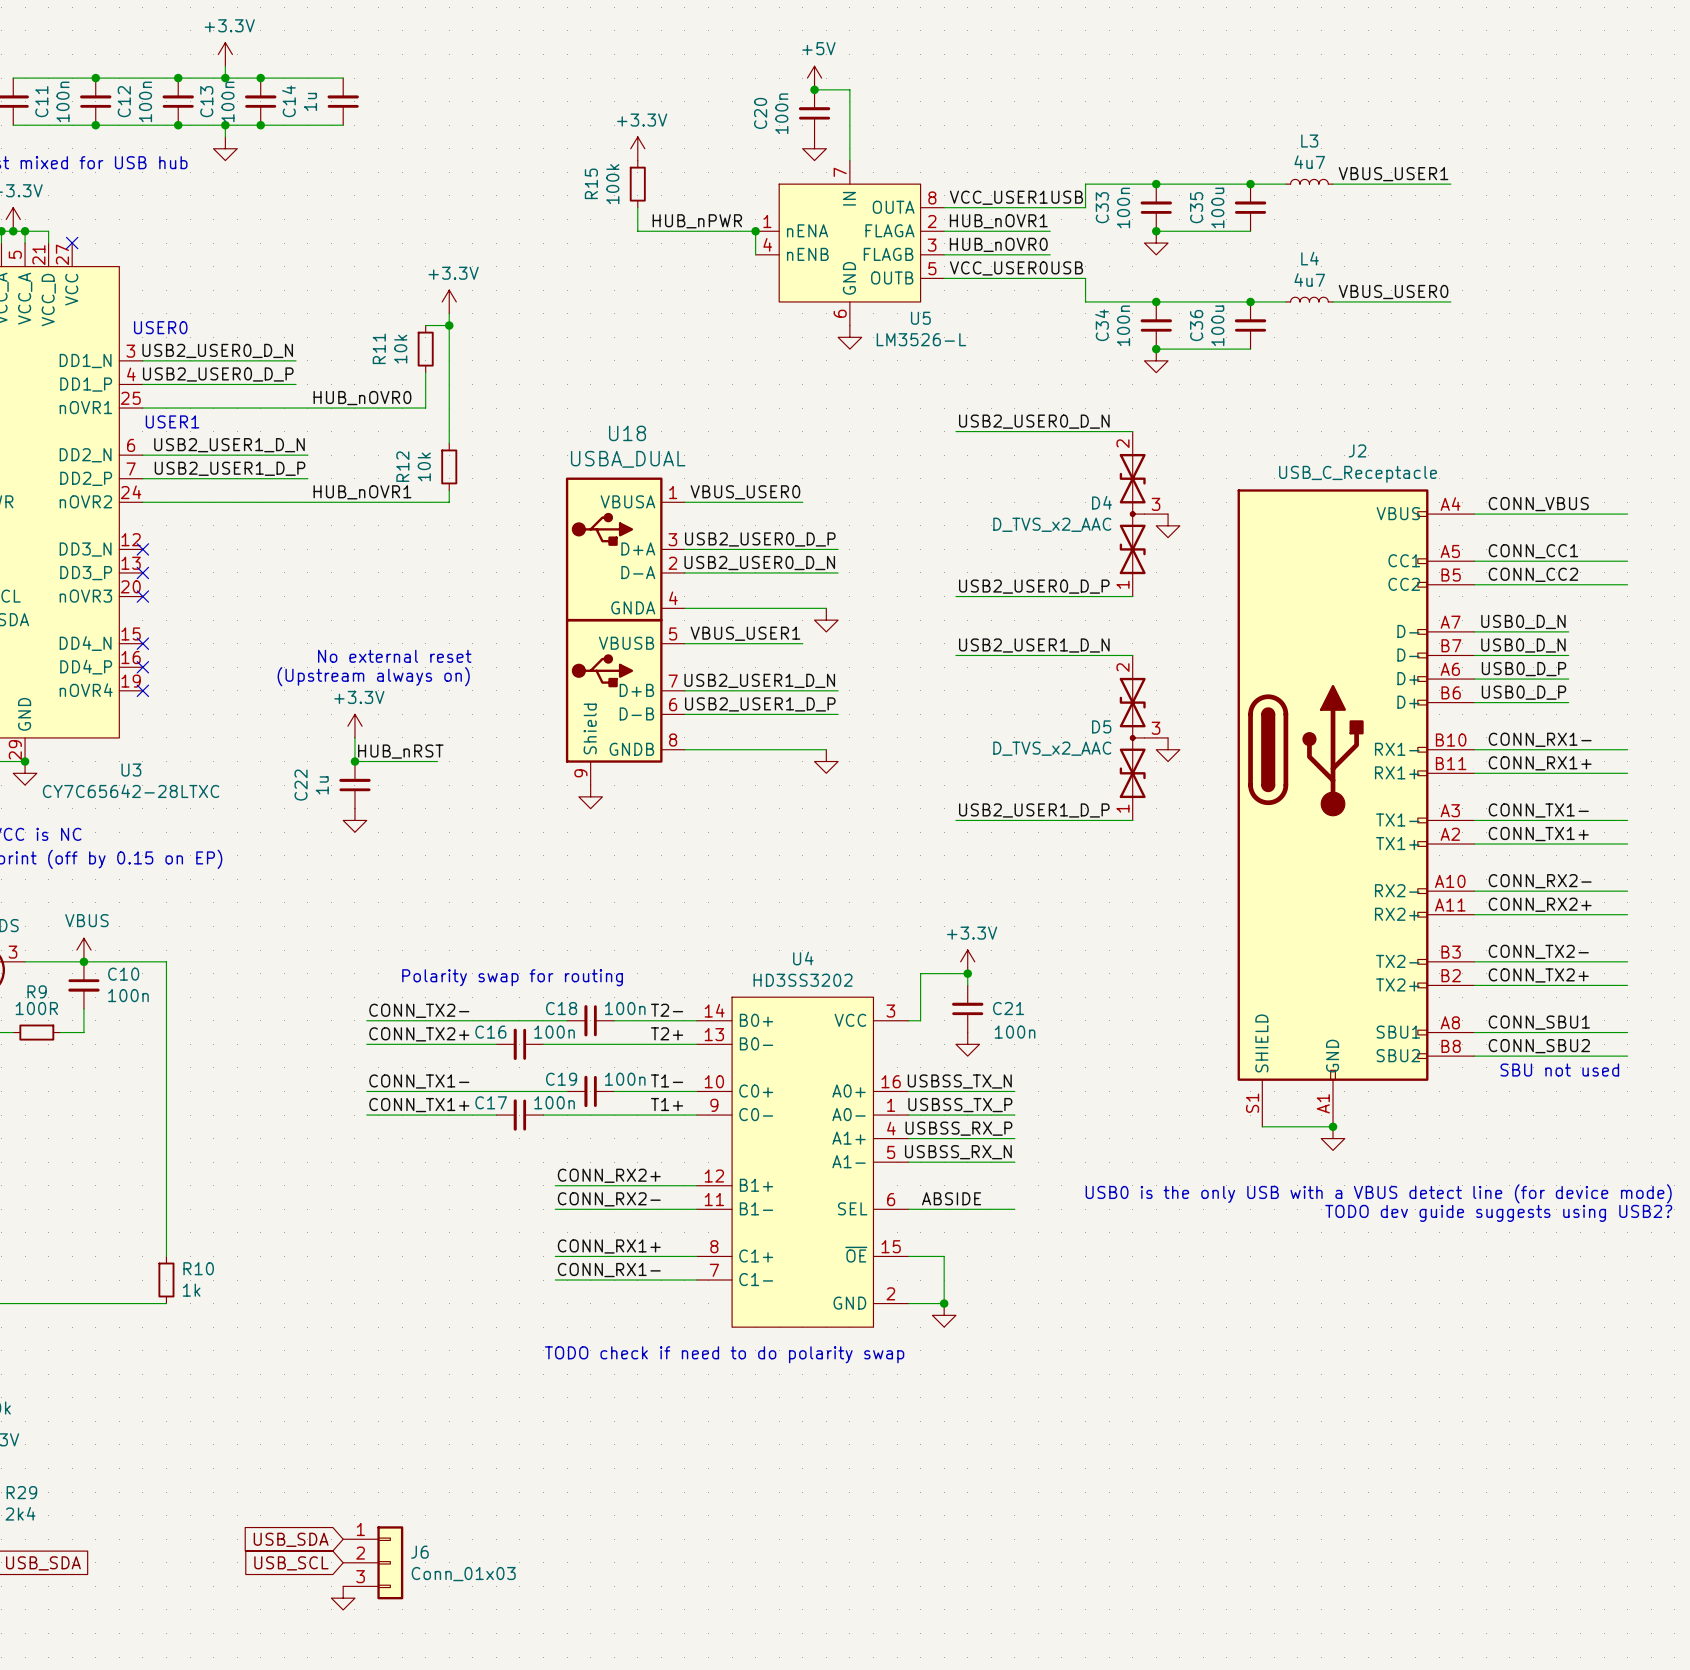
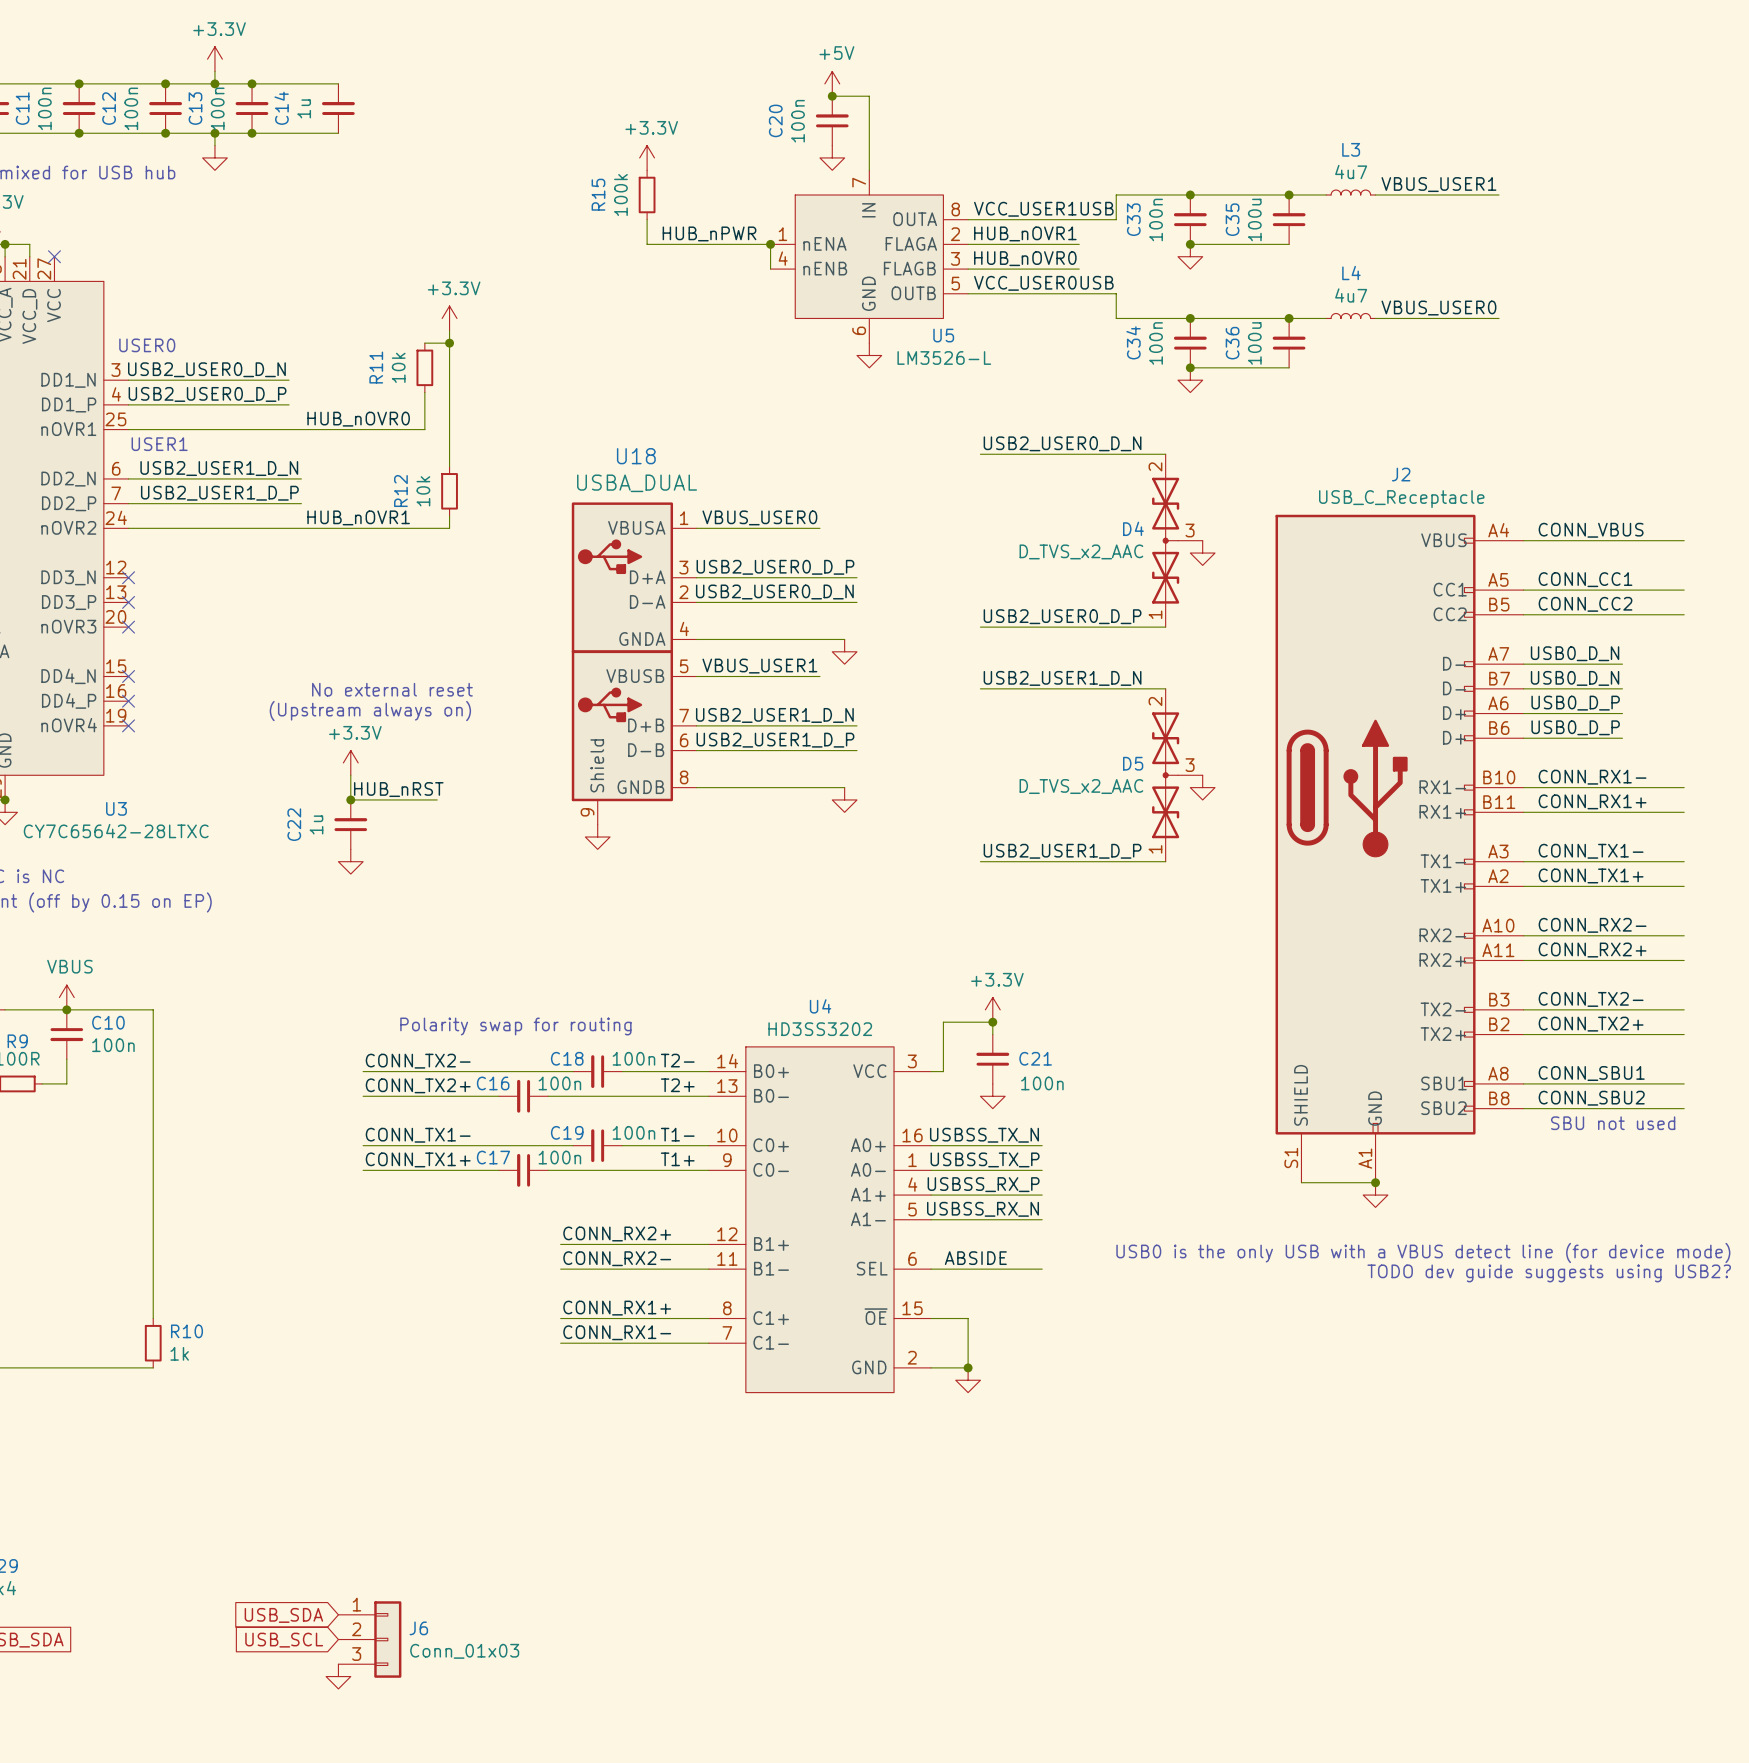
text: TODO check if need to do polarity swap (724, 1354) -> none

